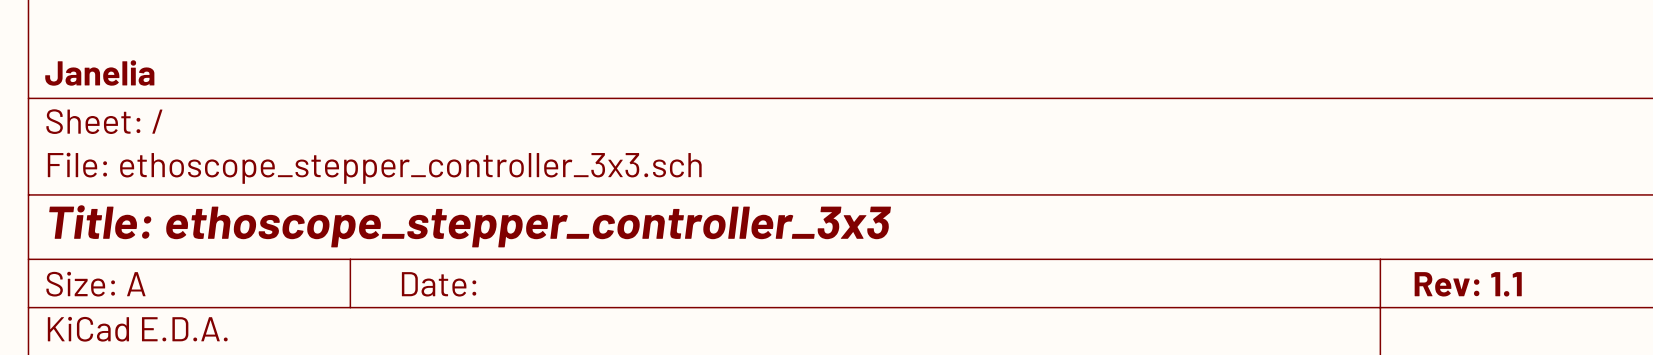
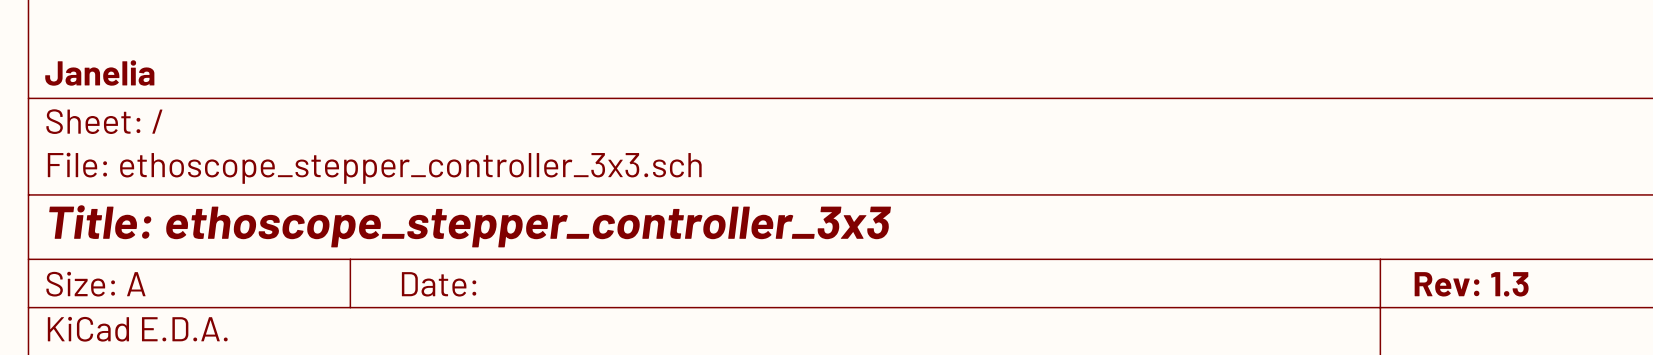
title block: Rev: 1.1 (1468, 284) -> Rev: 1.3 (1471, 284)

